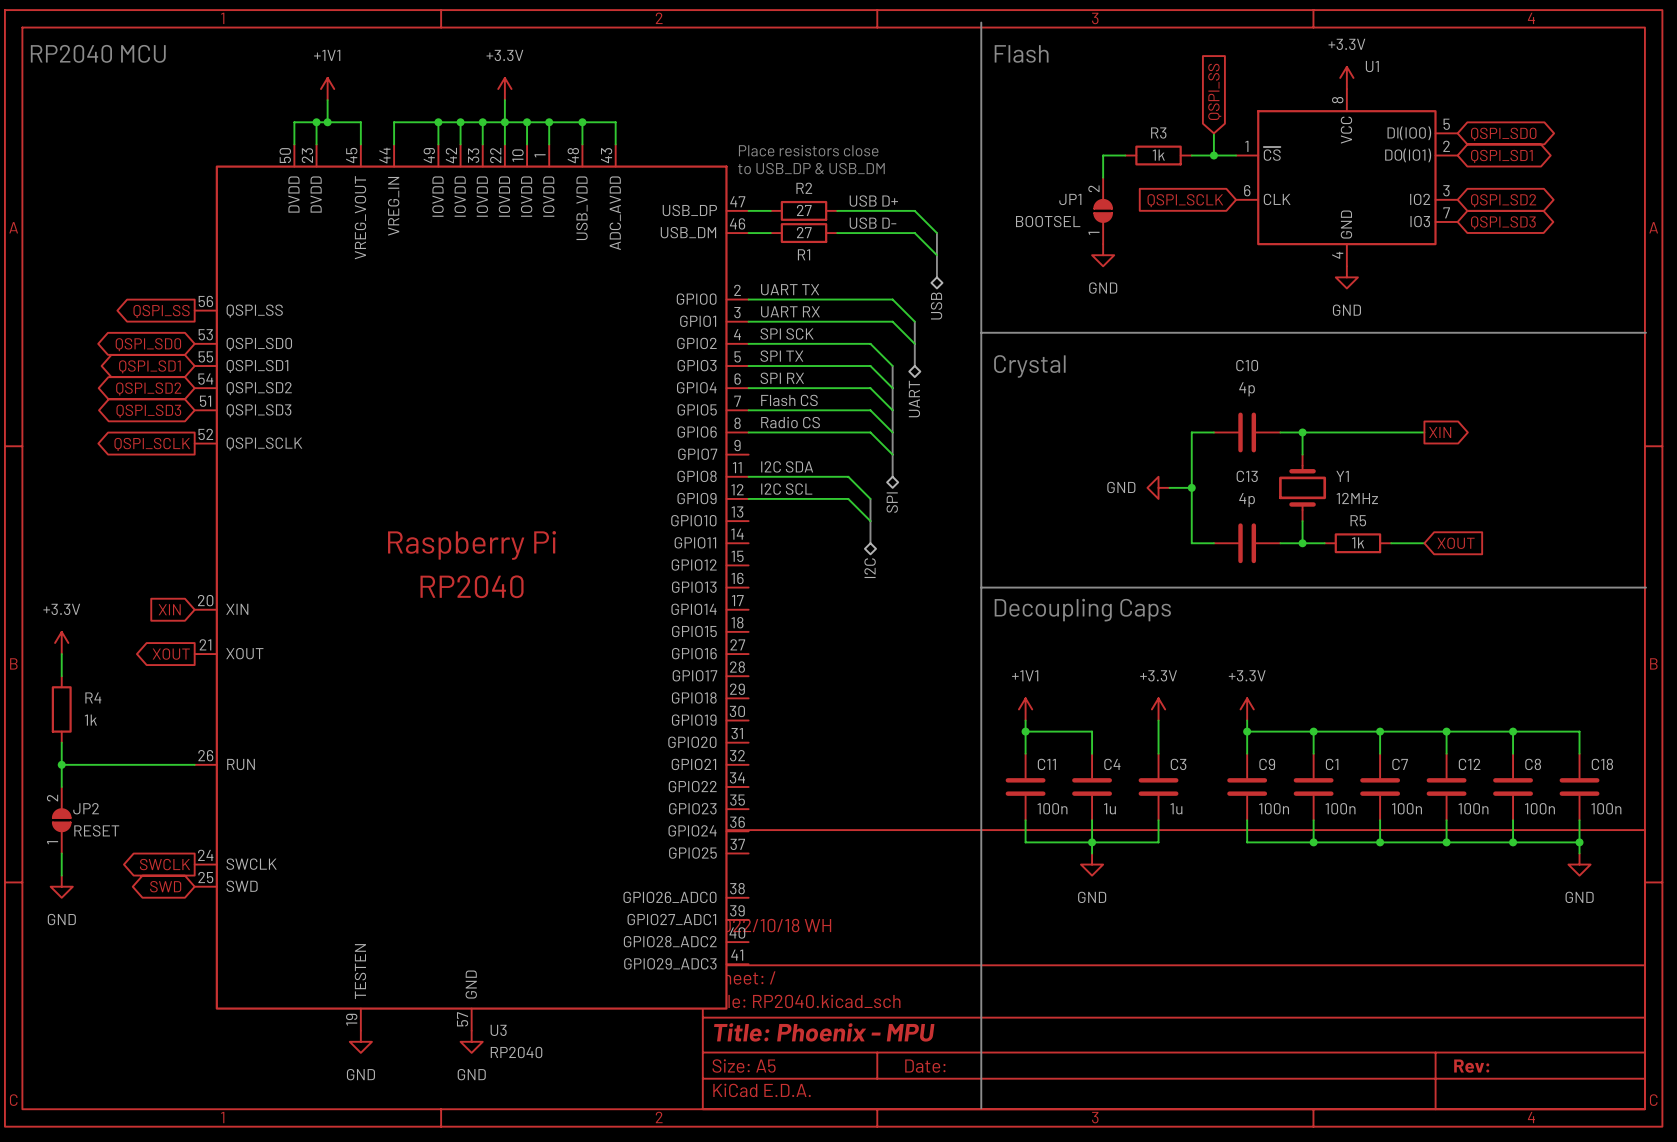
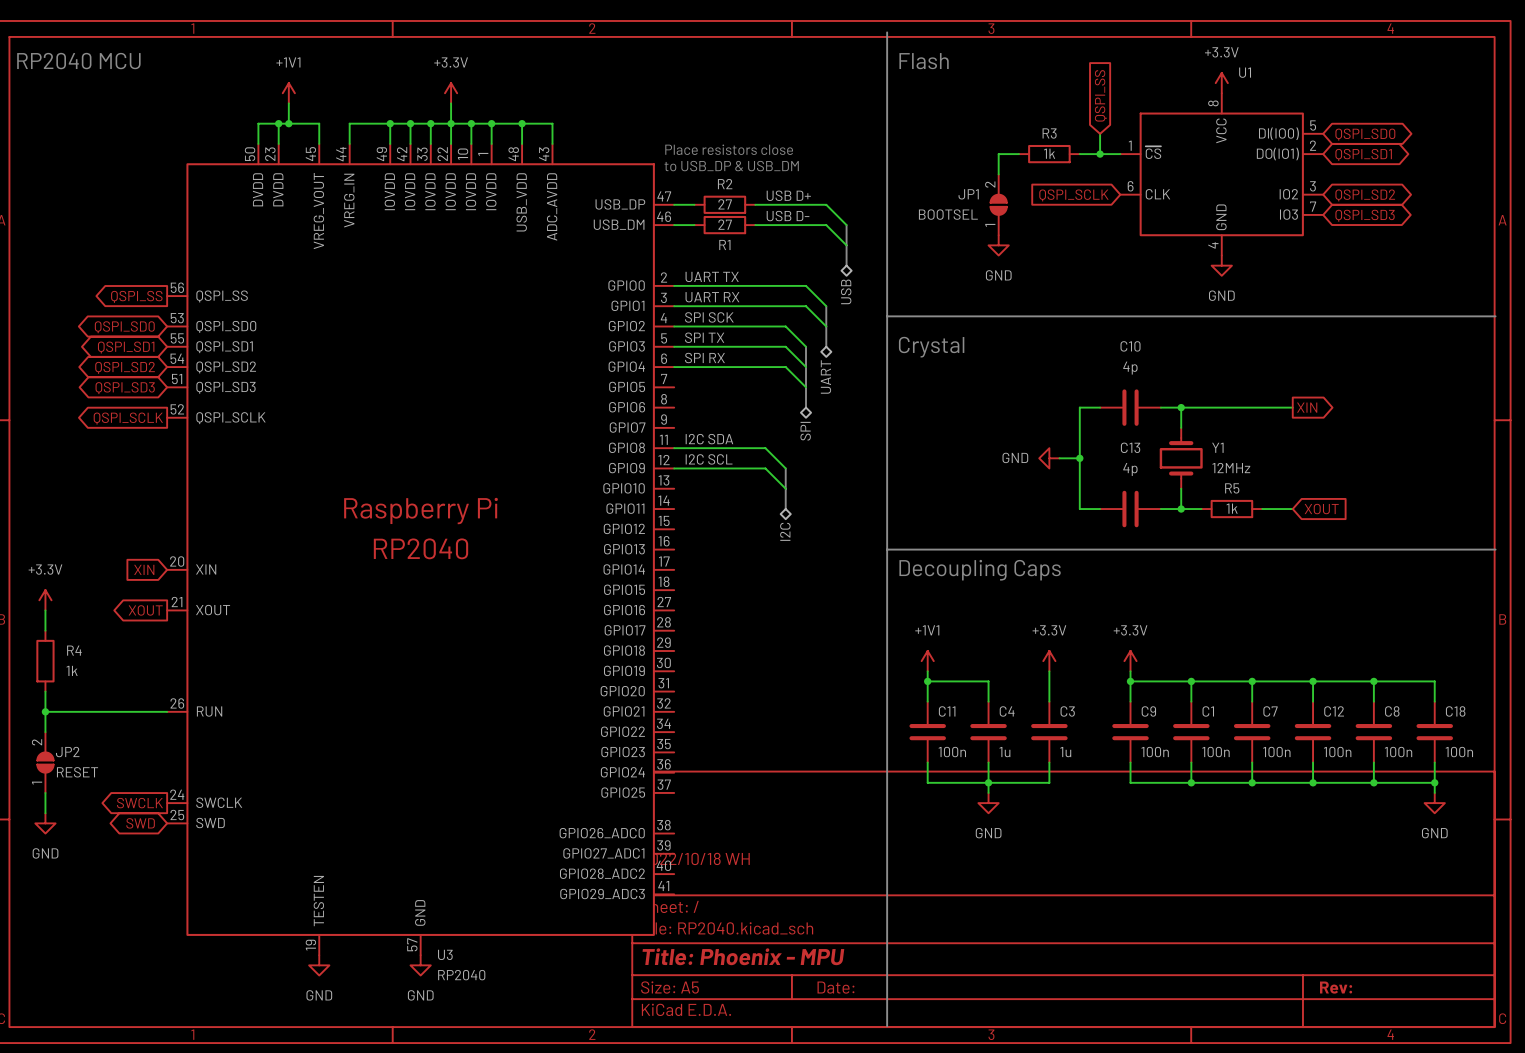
label: Flash CS (789, 400) -> none
wire: (748, 410) (870, 410) (892, 432) -> none
label: Radio CS (790, 422) -> none
wire: (748, 432) (870, 432) (892, 454) -> none
bus: (892, 432) (892, 476) -> none
hierarchical label position: SPI (892, 502) -> SPI (805, 431)

